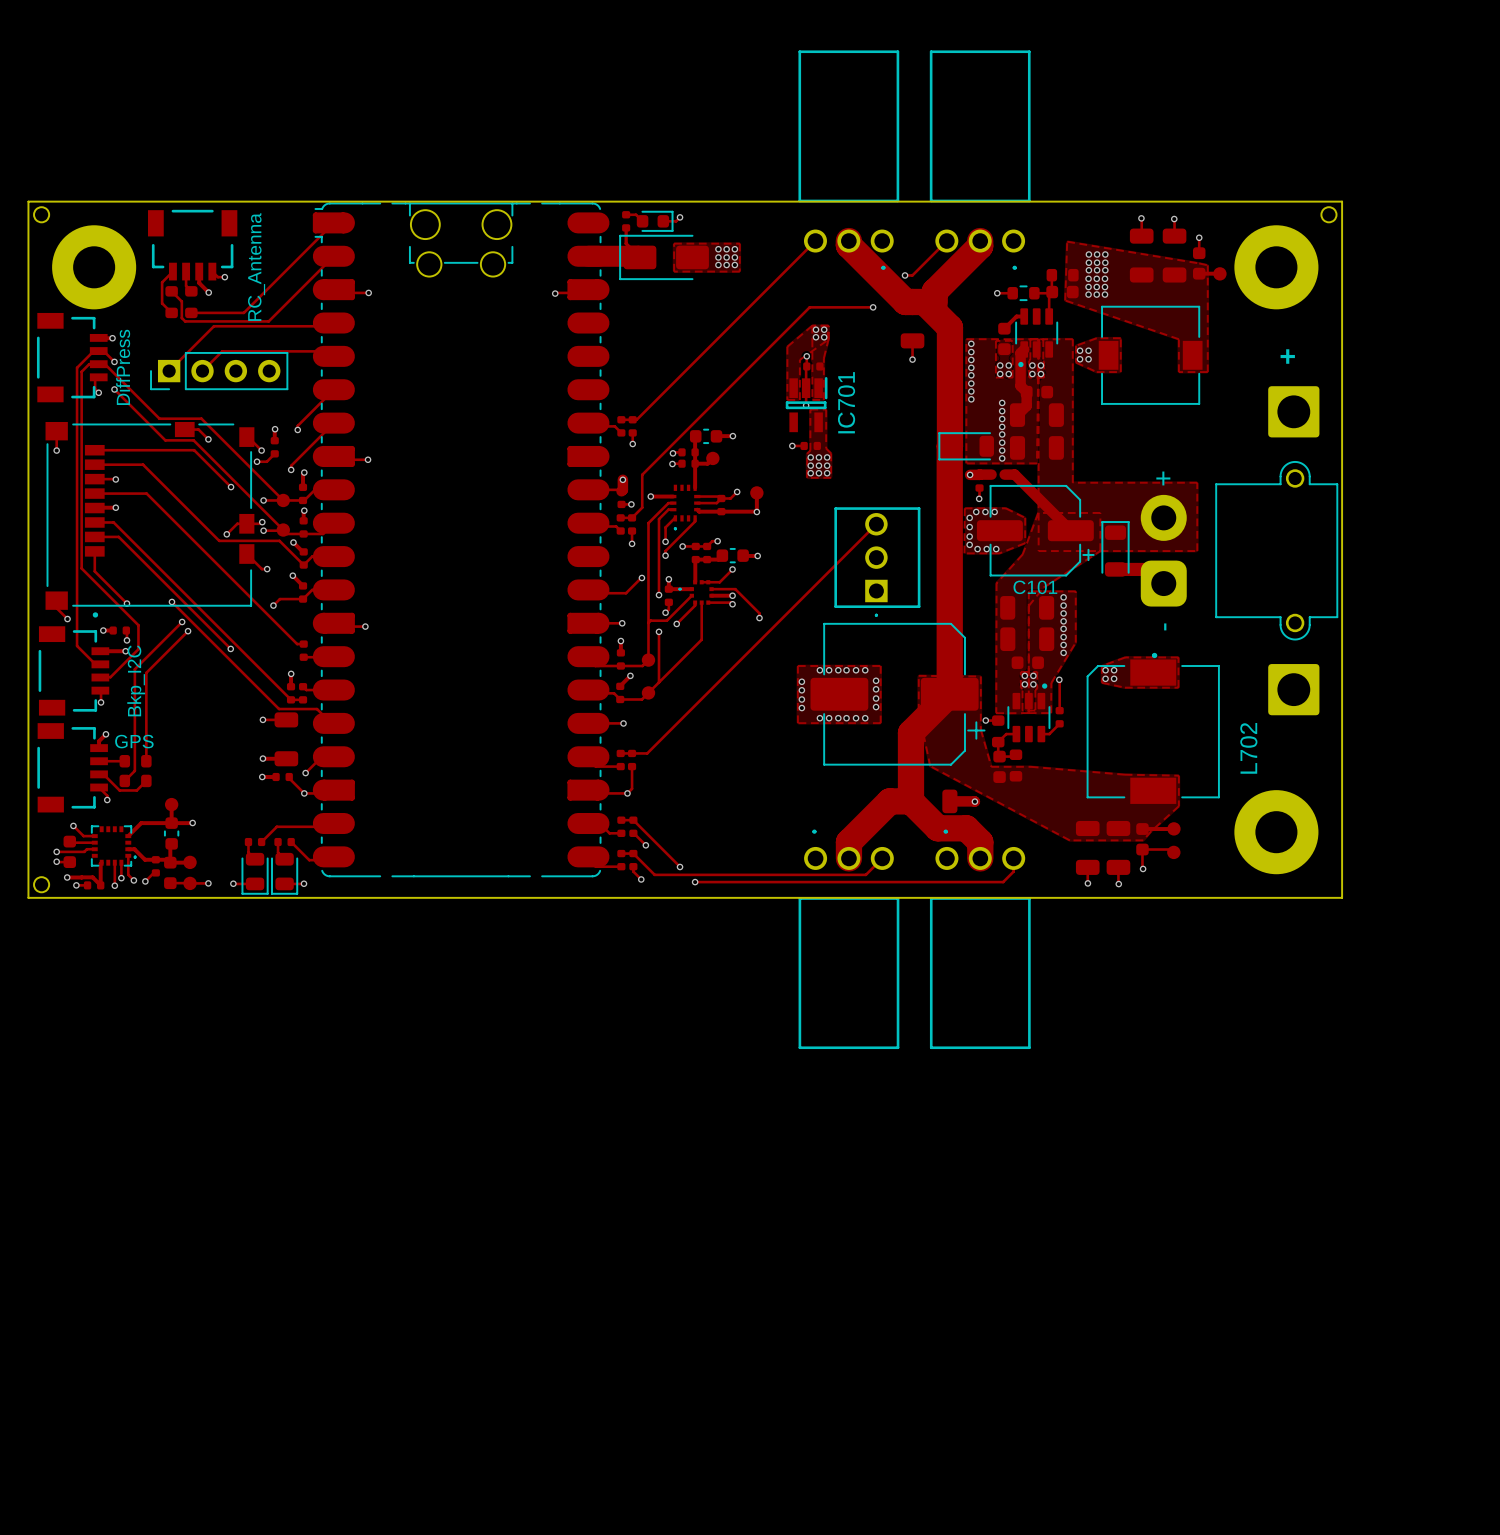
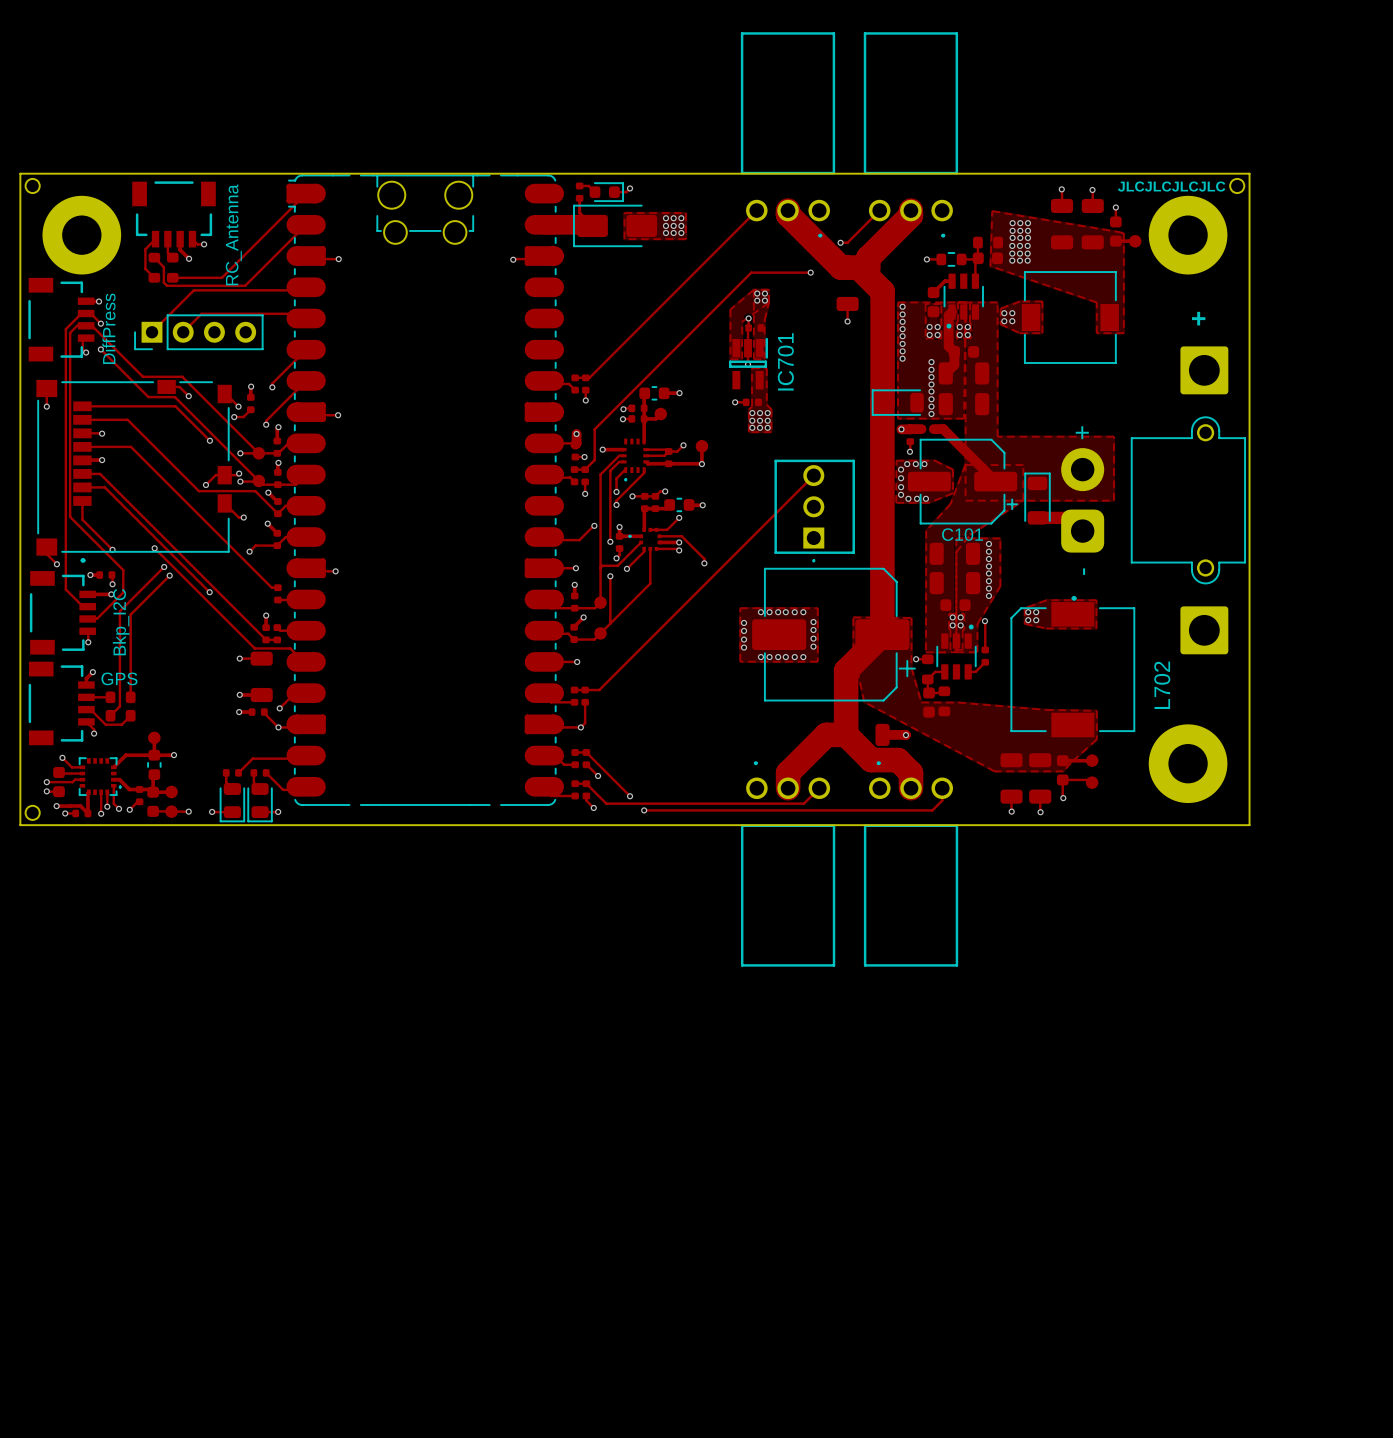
drawing: none -> [1118, 181, 1226, 192]

